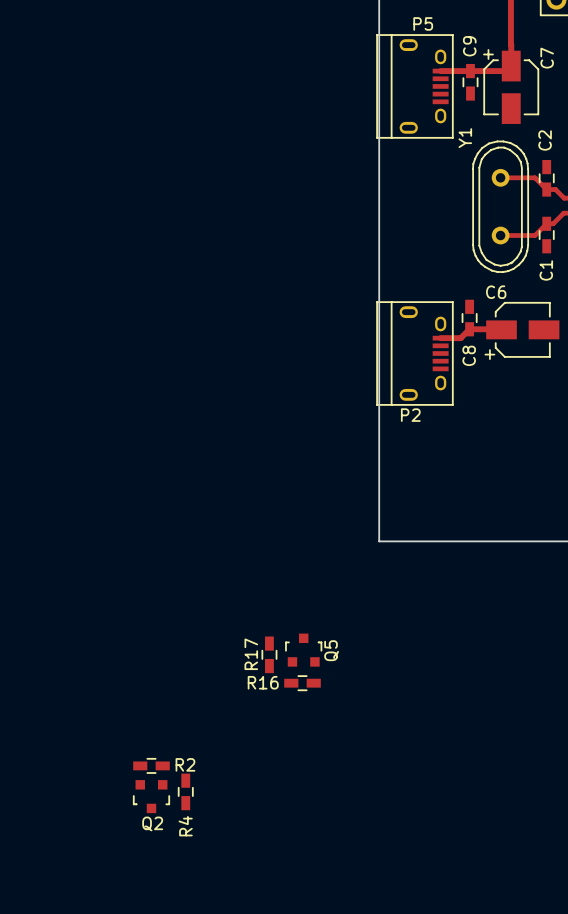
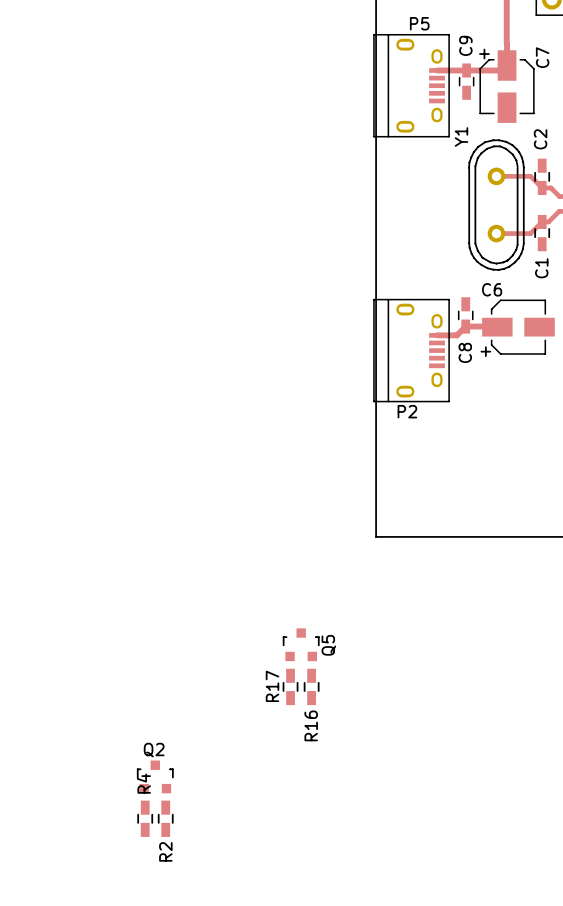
R17 position: (269, 654) -> (290, 686)
R16 name position: R16 (263, 682) -> R16 (311, 725)
R16 rotation: 0° (302, 683) -> 90° clockwise (311, 686)
R2 rotation: 0° (151, 765) -> 90° clockwise (165, 818)
R2 position: (151, 765) -> (165, 818)
R4 position: (185, 791) -> (145, 818)
Q2 rotation: 0° (151, 796) -> 180° (155, 776)
R4 name position: R4 (185, 826) -> R4 (143, 783)

